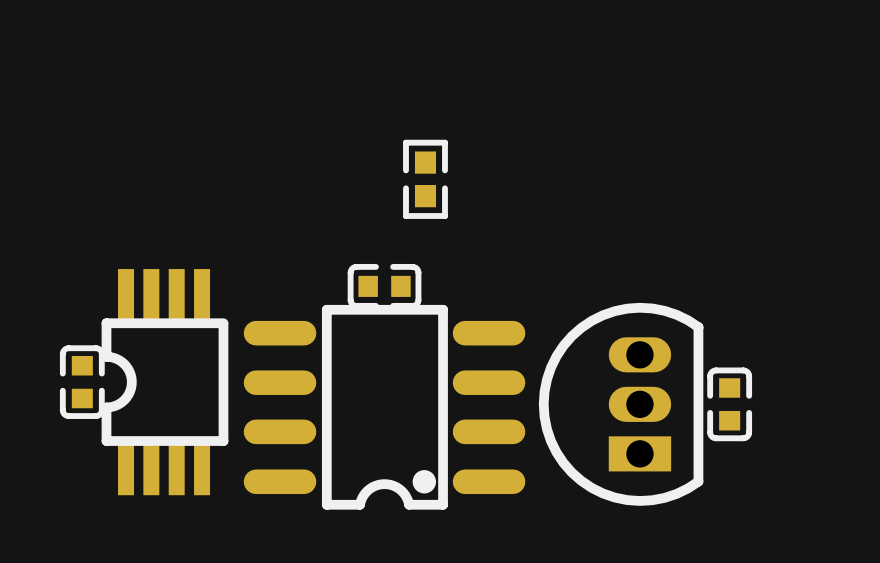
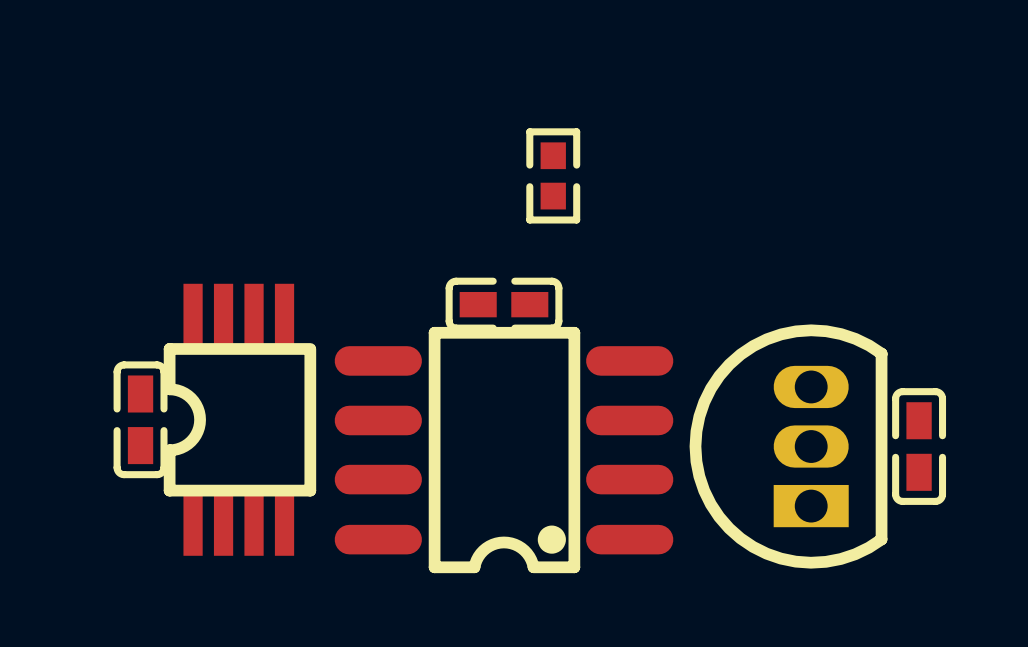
part footprint: [347, 263, 422, 309] -> [445, 277, 563, 332]
part footprint: [59, 345, 105, 419] -> [113, 361, 168, 479]
part footprint: [707, 367, 753, 442] -> [892, 388, 947, 505]

